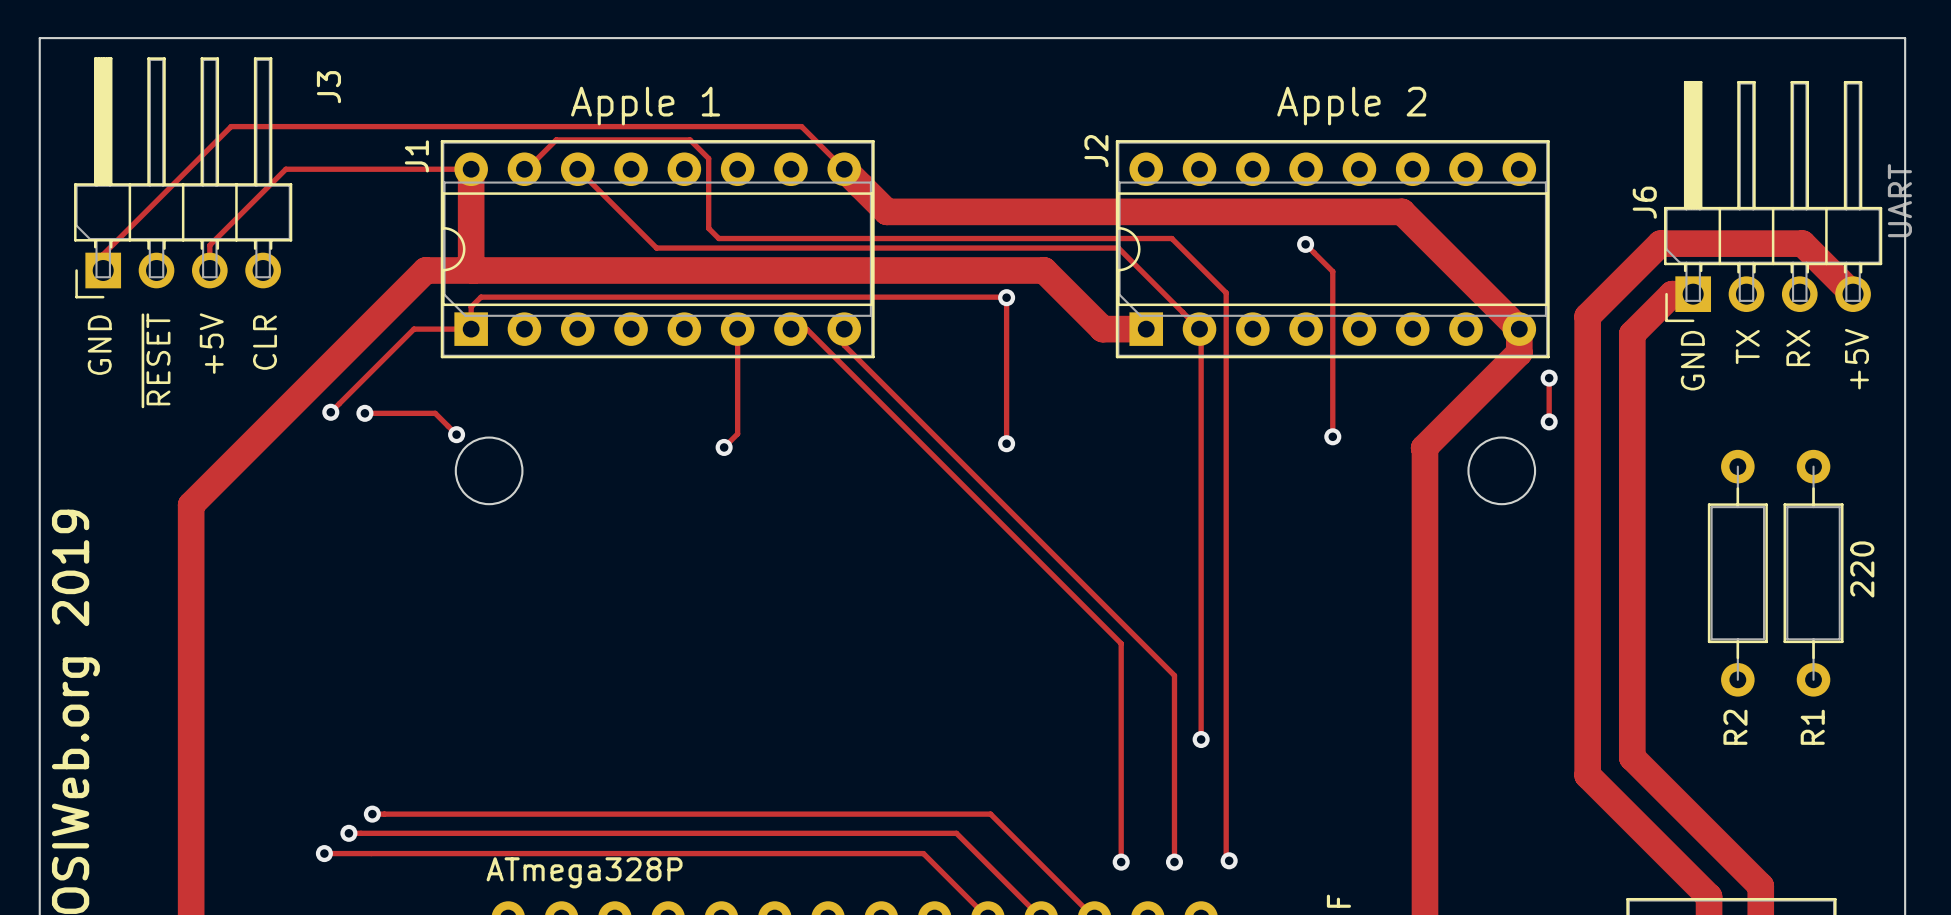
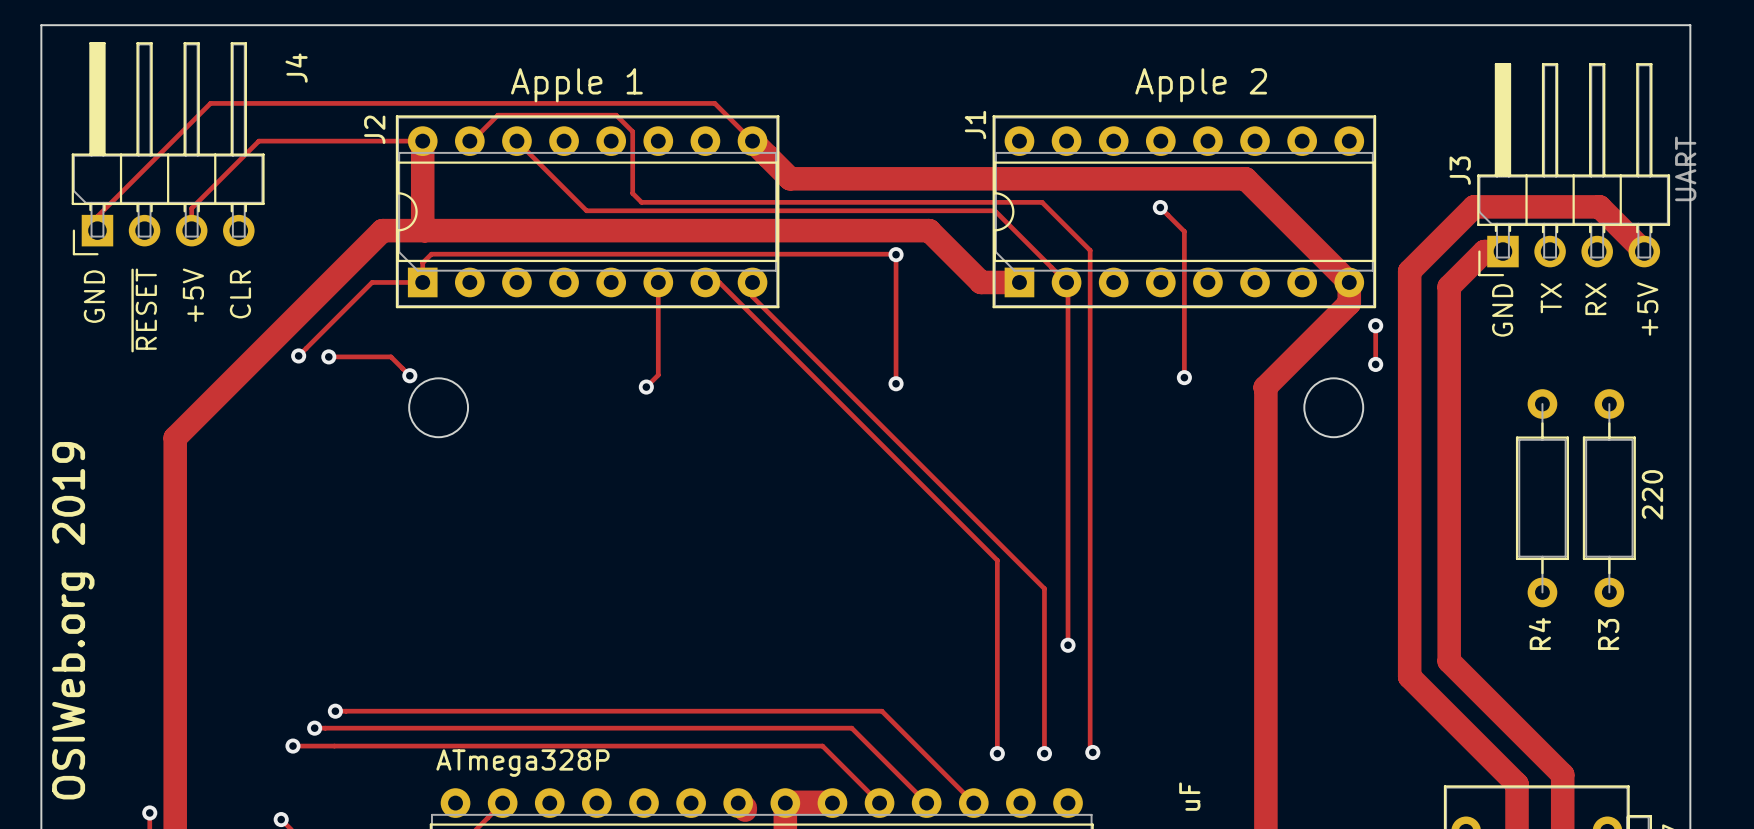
J3 name: J3 (328, 87) -> J4 (296, 68)
J2 name: J2 (1096, 151) -> J1 (975, 125)
J1 name: J1 (416, 156) -> J2 (374, 129)
J6 name: J6 (1644, 202) -> J3 (1460, 170)
R2 name: R2 (1735, 727) -> R4 (1539, 633)
R1 name: R1 (1812, 727) -> R3 (1608, 634)

